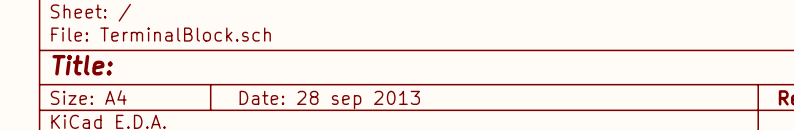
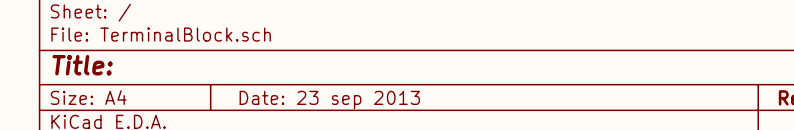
title block: Date: 28 sep 2013 (329, 100) -> Date: 23 sep 2013 (329, 100)

